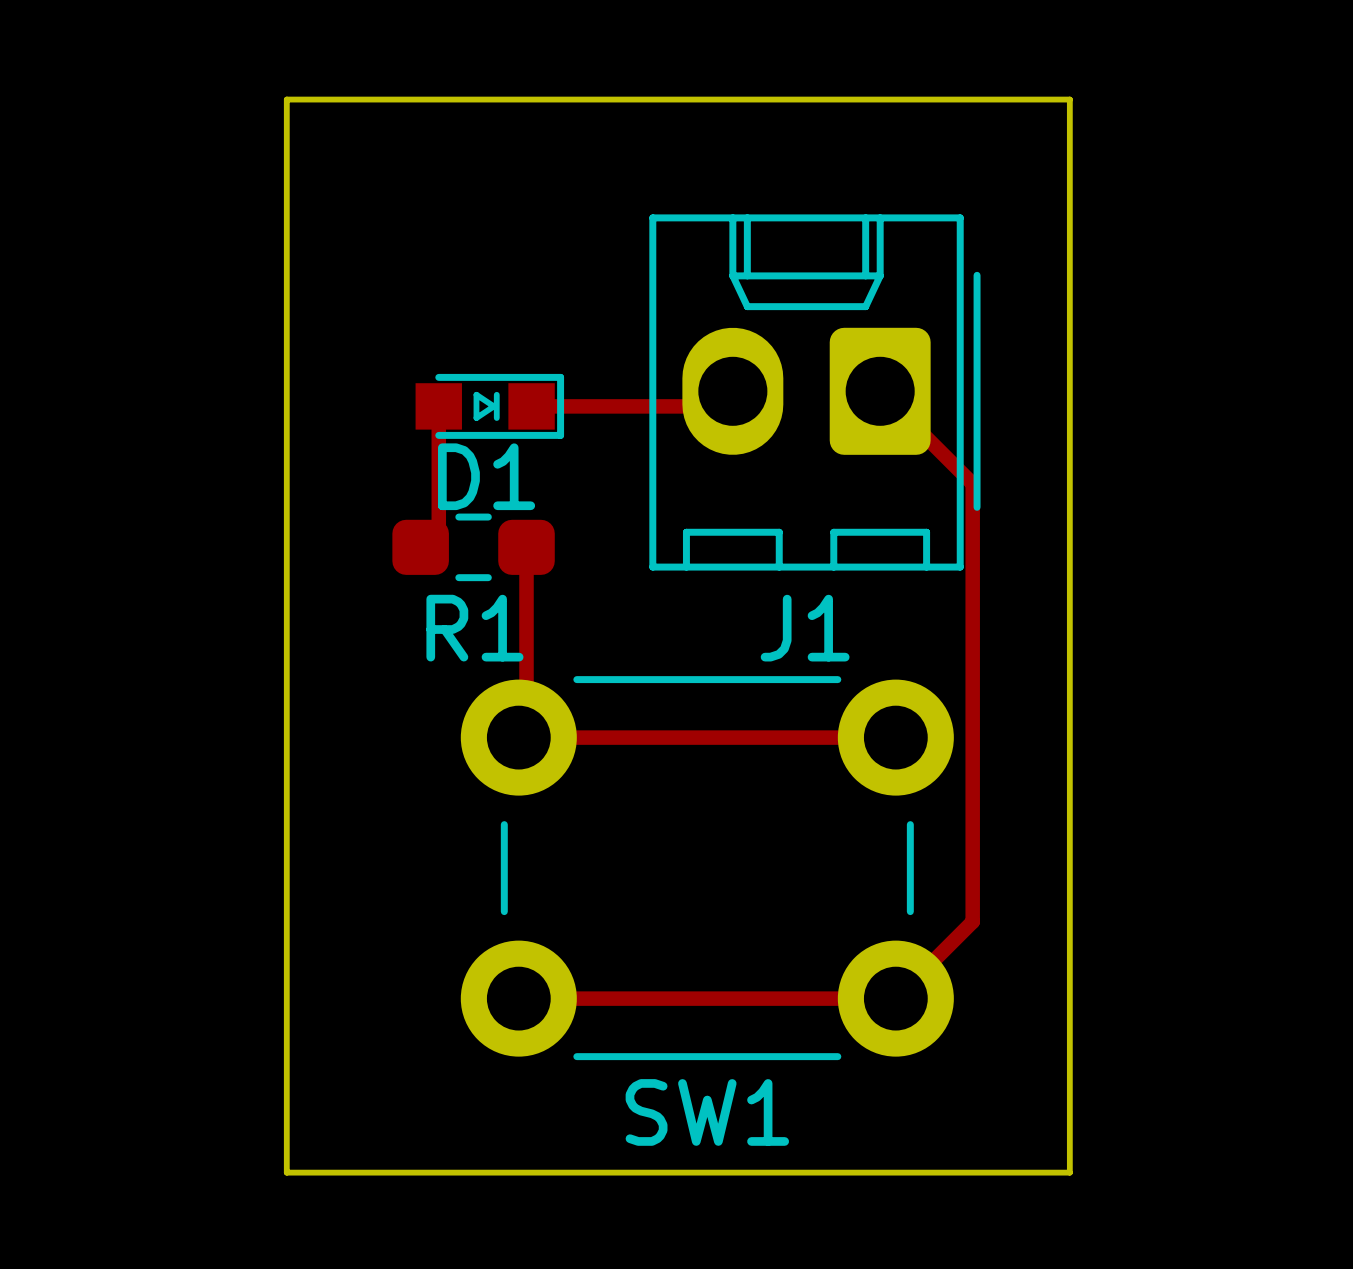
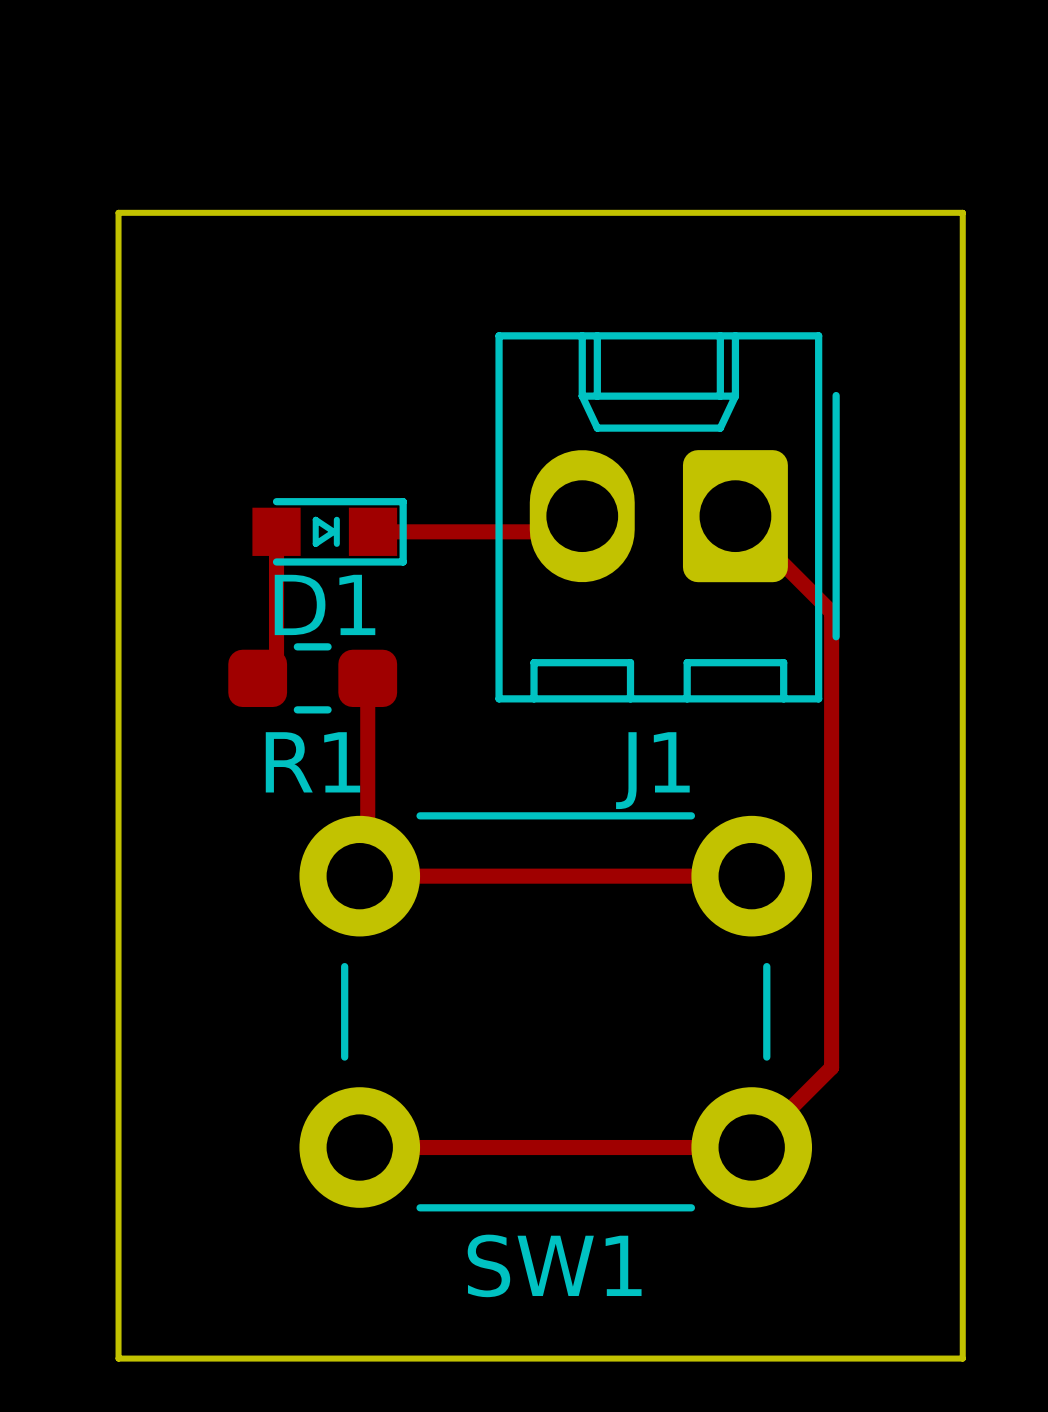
board edge: (1069, 99) (1069, 1172) (286, 1172) -> (932, 212) (962, 212) (962, 1358) (118, 1358) (118, 1328)

